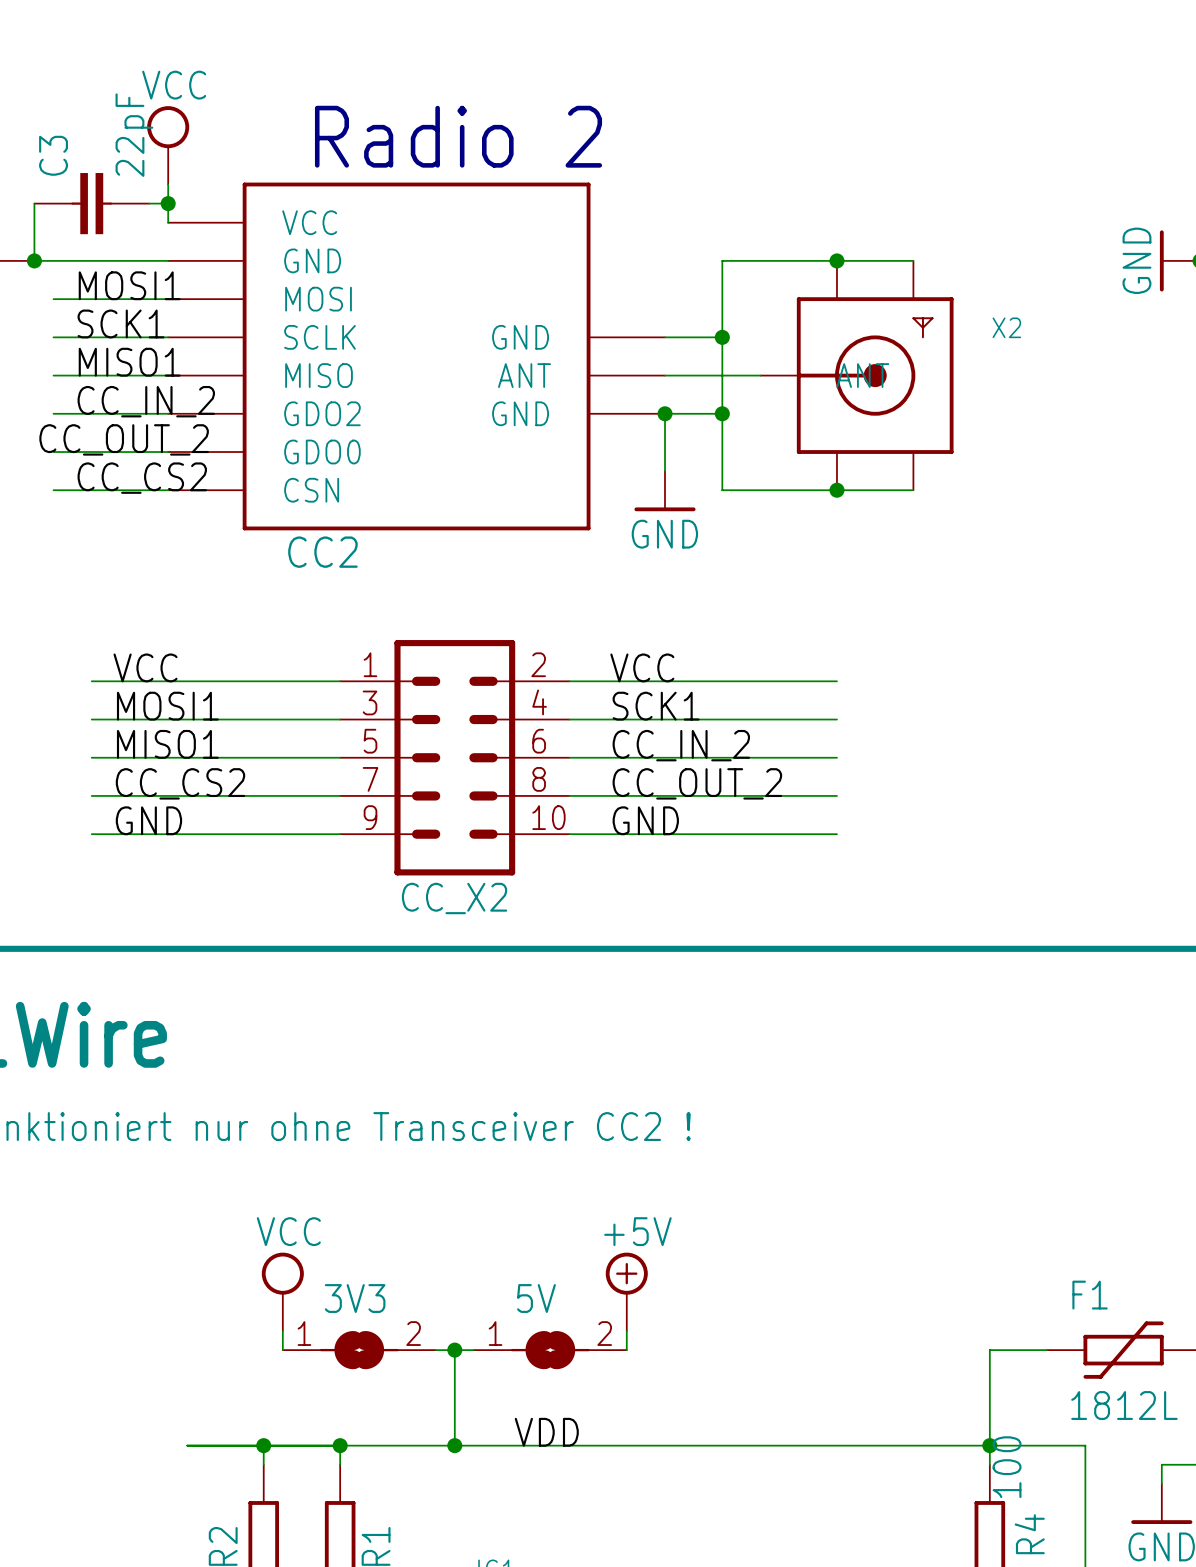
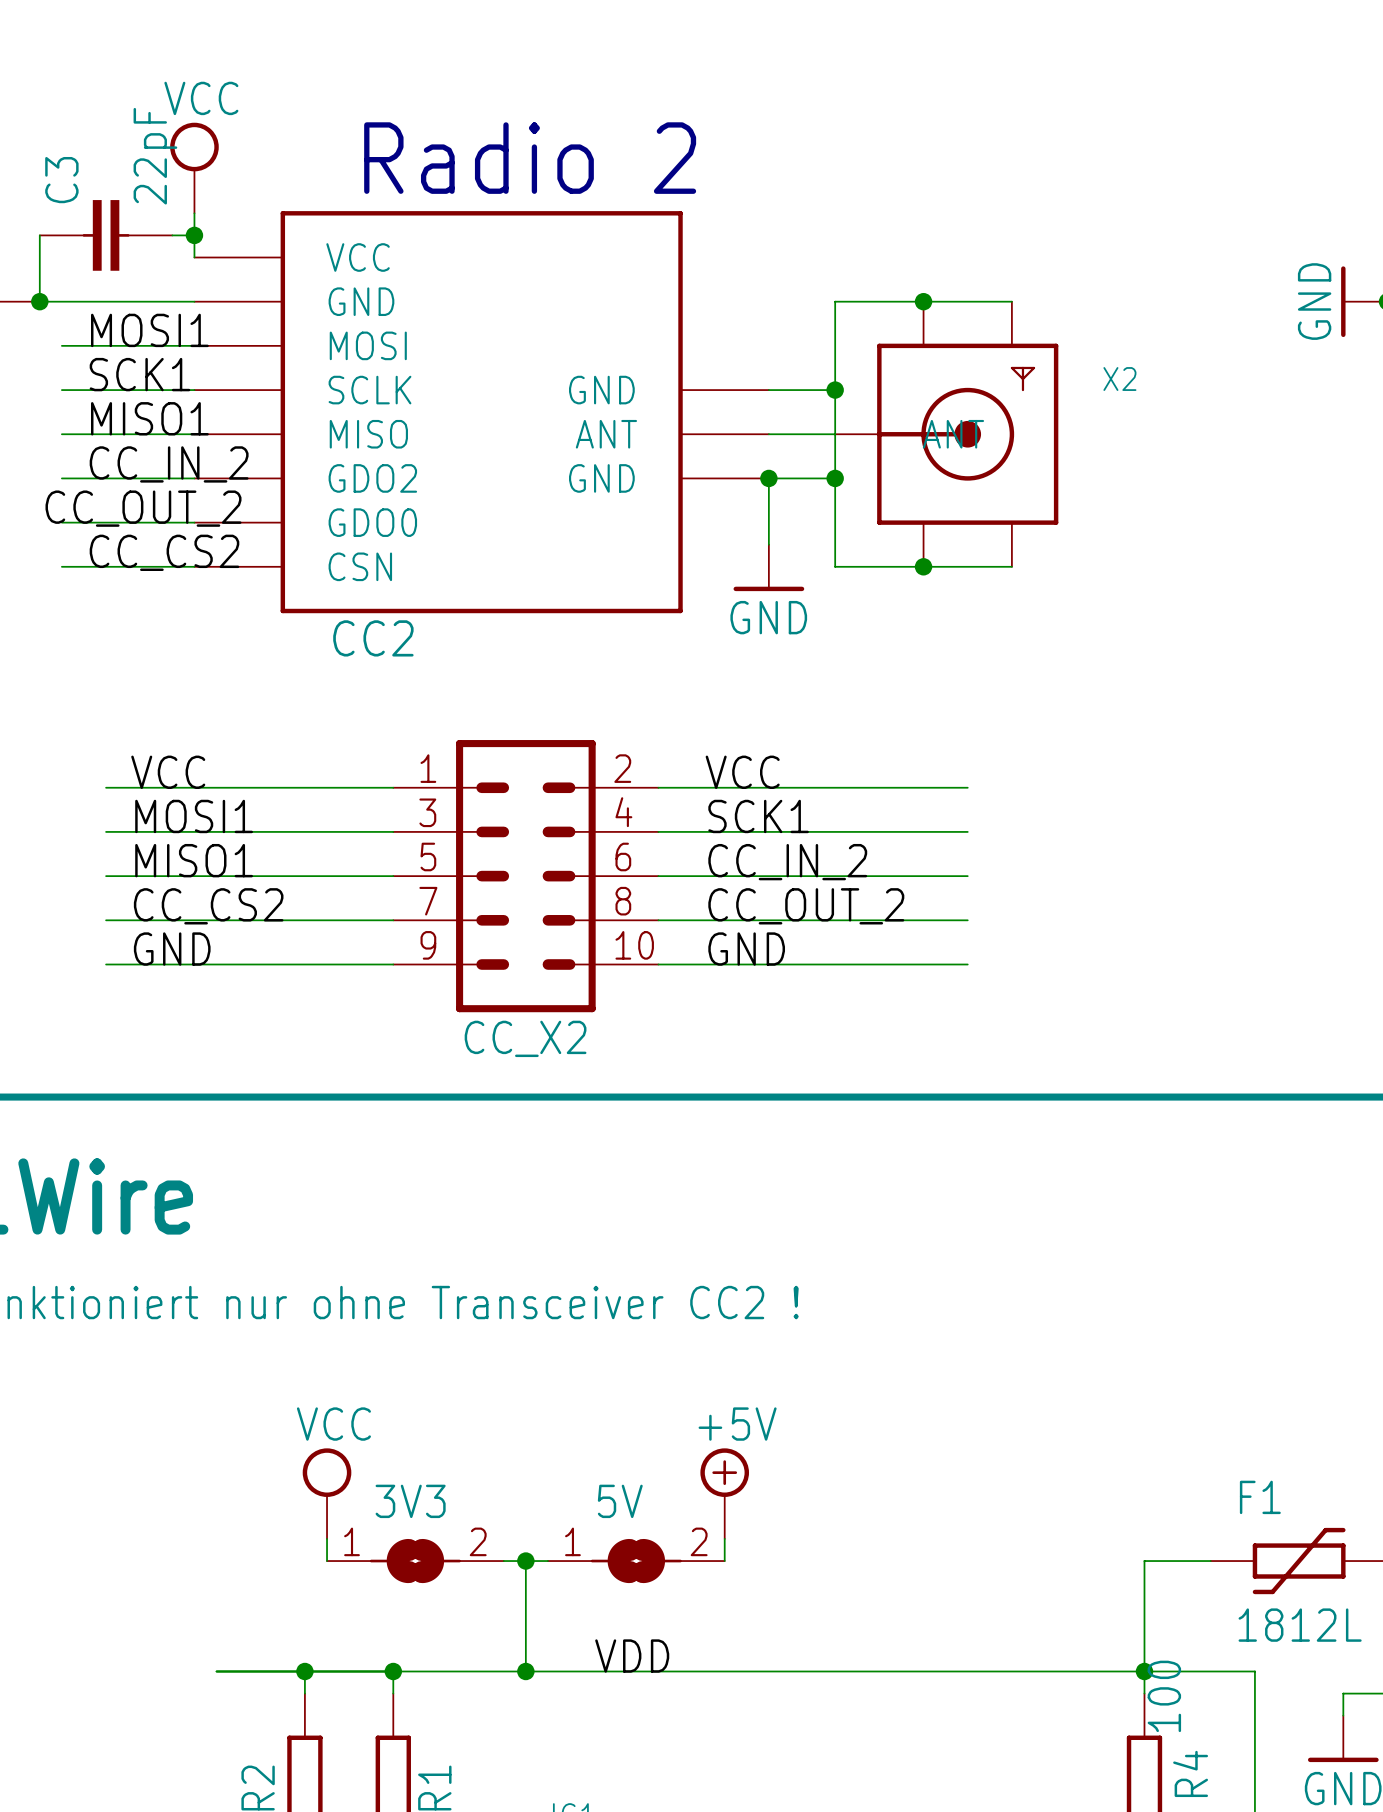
junction position: (836, 260) -> (923, 301)
wire: (875, 260) (913, 260) -> none
X2 position: (857, 375) -> (946, 434)
junction position: (836, 490) -> (923, 566)
wire: (875, 490) (913, 490) -> none

